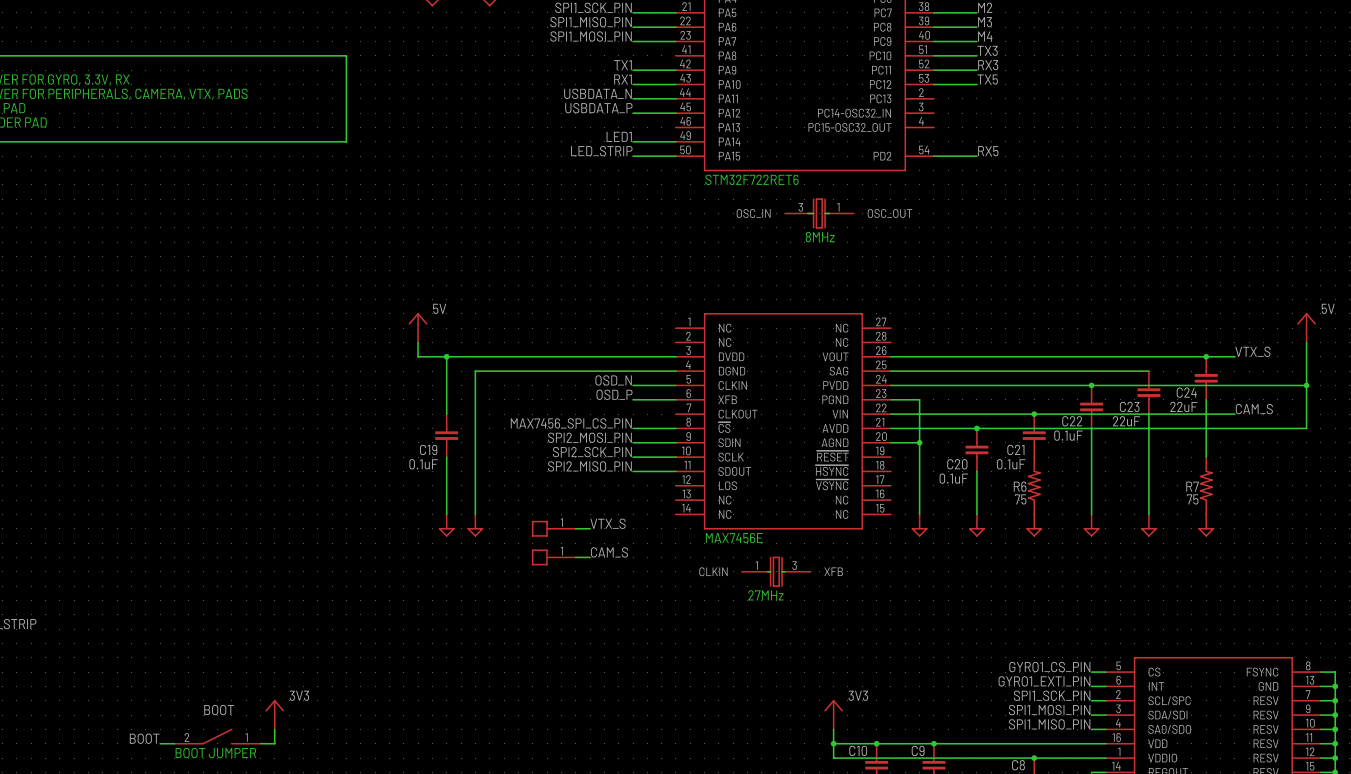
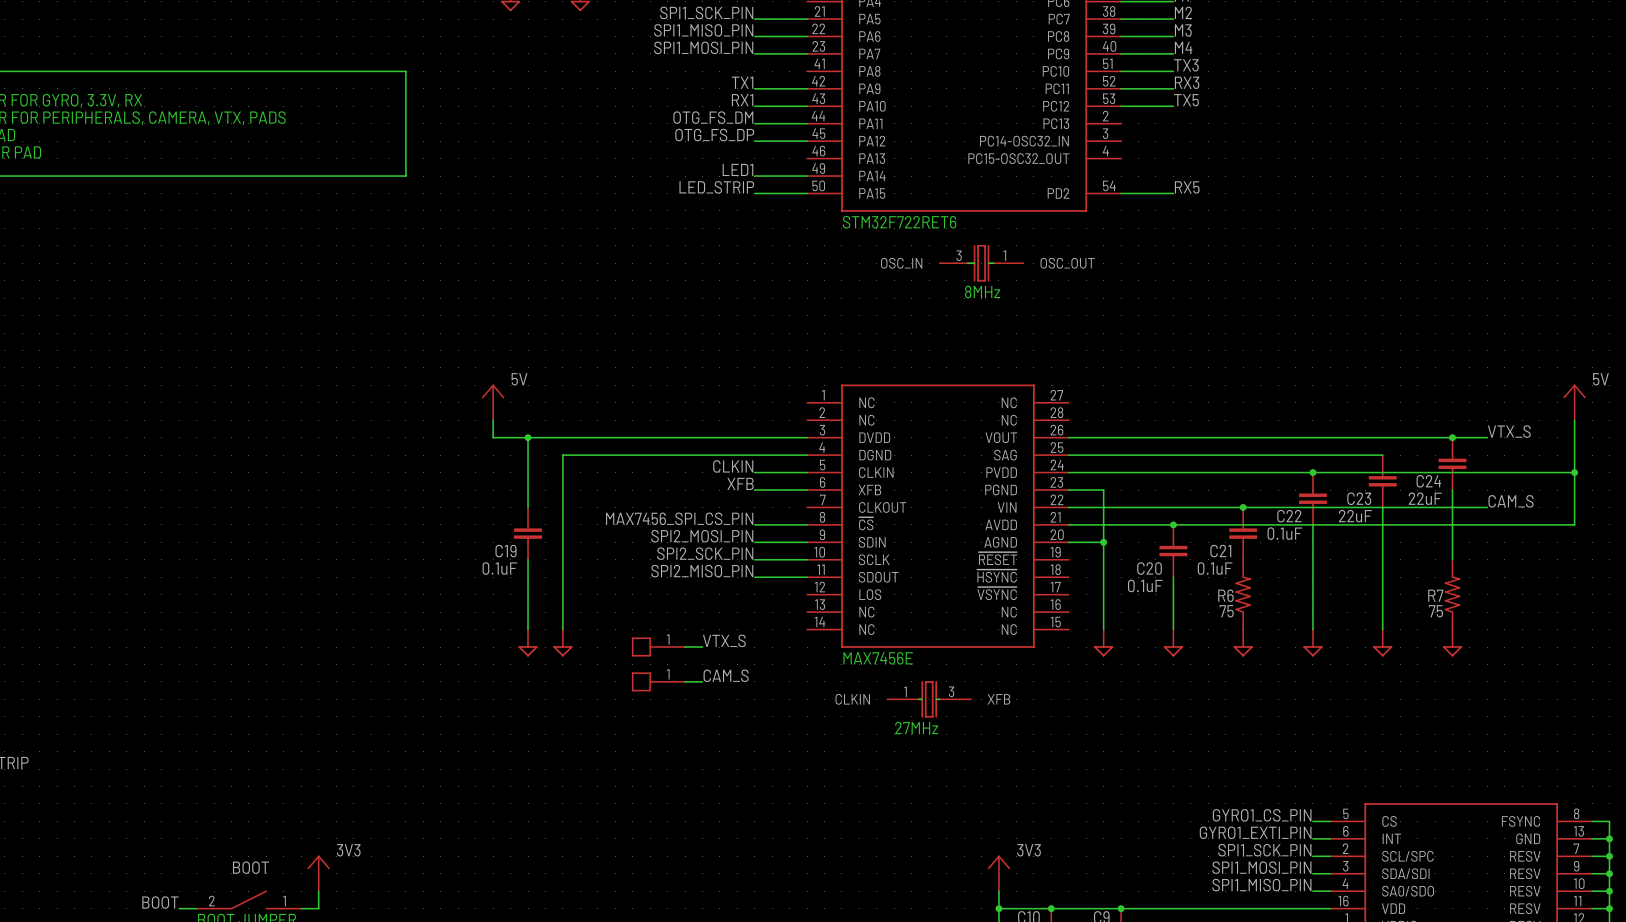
label: USBDATA_N (598, 93) -> OTG_FS_DM (713, 117)
label: USBDATA_P (598, 108) -> OTG_FS_DP (714, 135)
label: OSD_N (613, 380) -> CLKIN (733, 466)
label: OSD_P (614, 394) -> XFB (740, 483)

